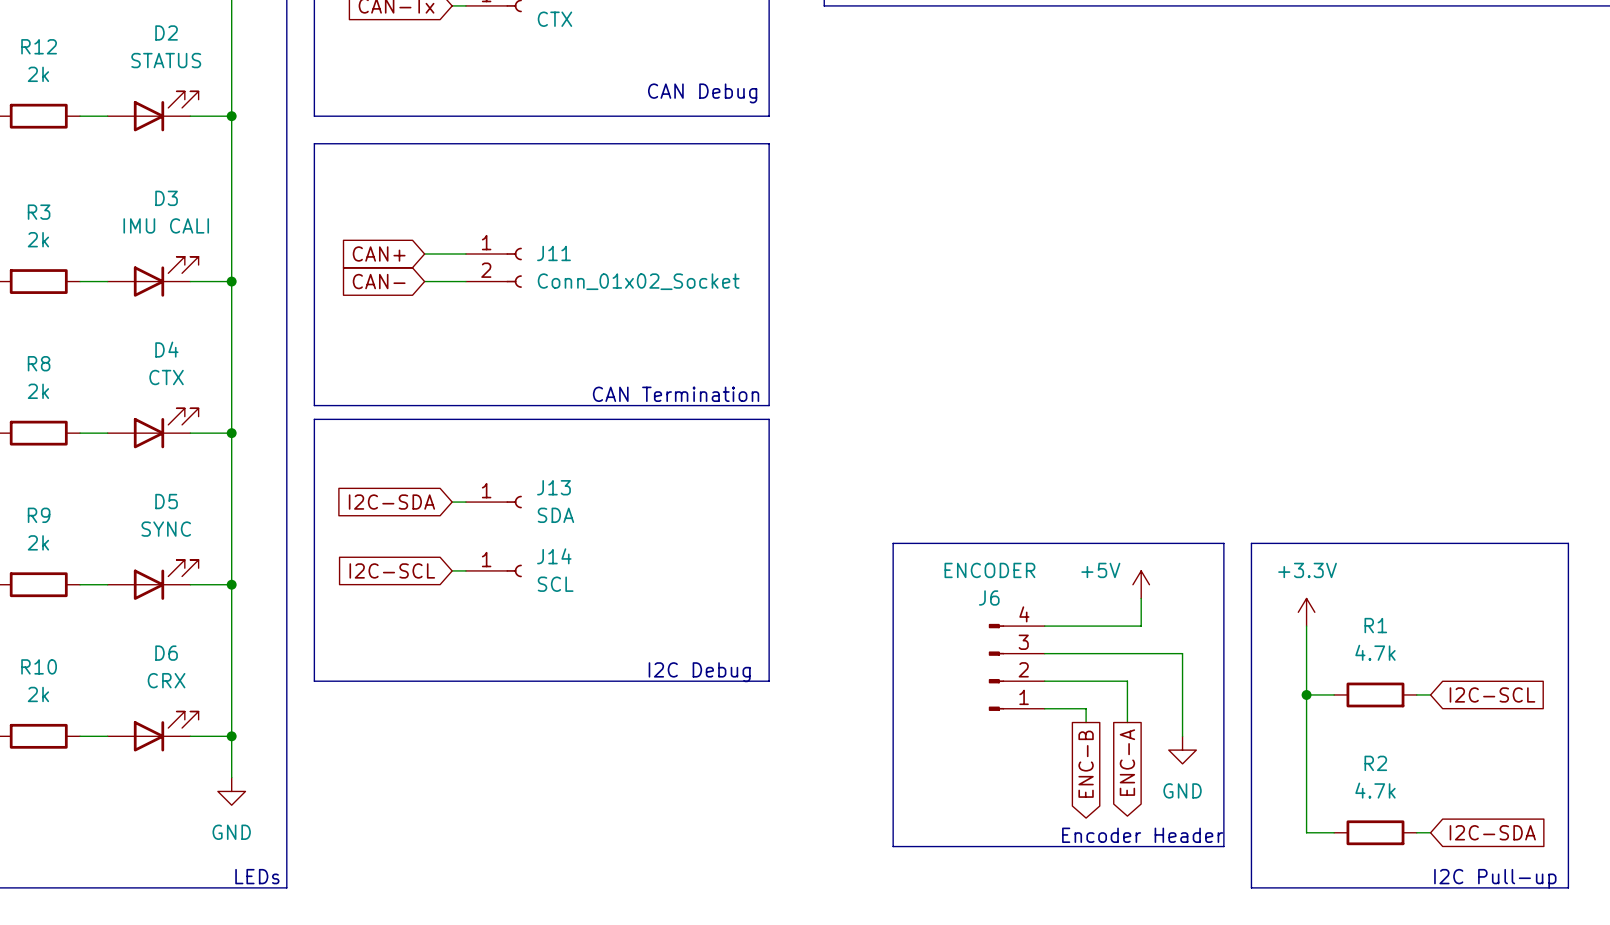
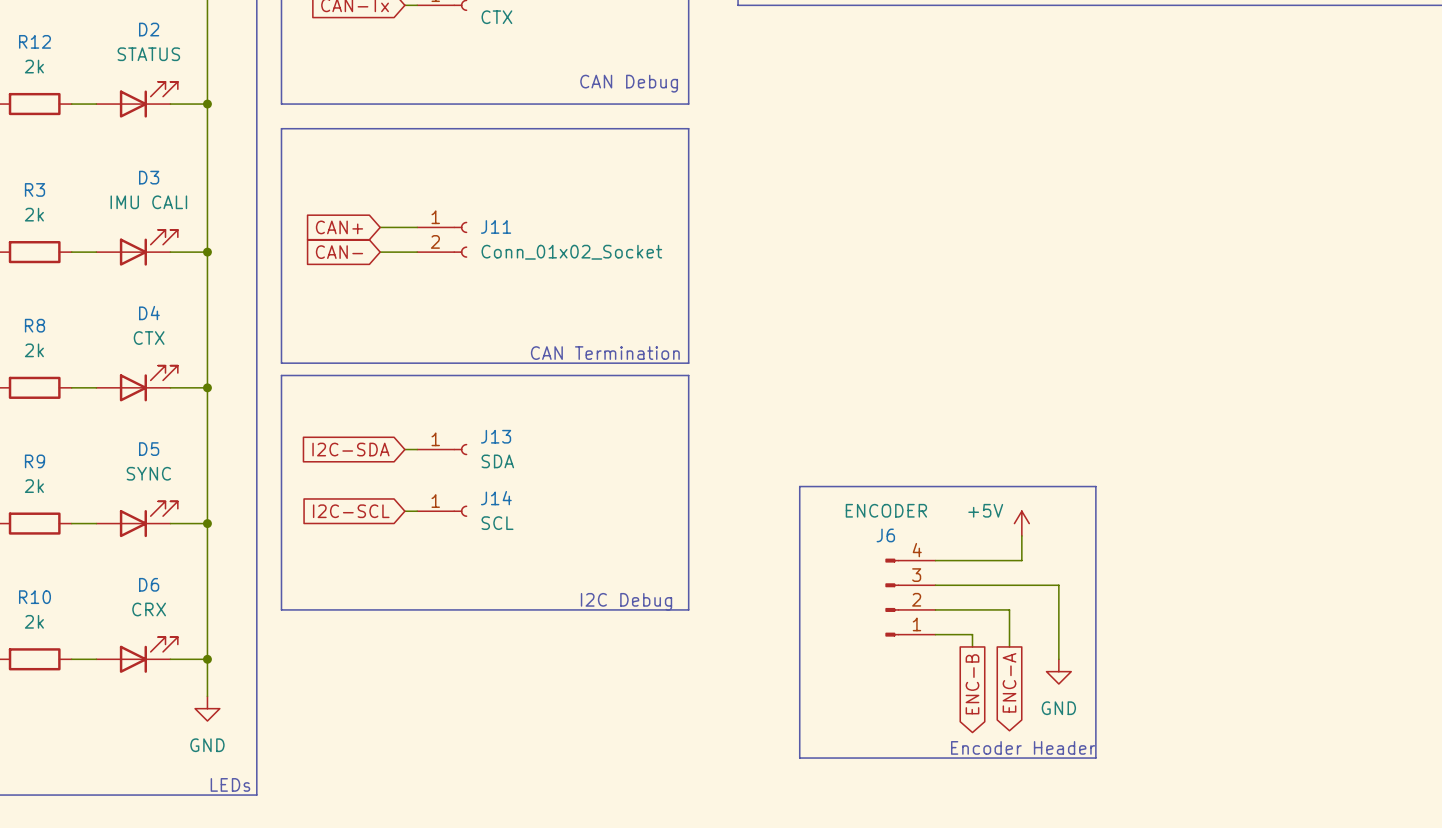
line: (1251, 543) (1568, 543) (1568, 887) (1251, 887) (1251, 543) -> none
power symbol: +3.3V (1306, 612) -> none
wire: (1306, 626) (1306, 832) (1334, 832) -> none
wire: (1306, 694) (1334, 694) -> none
junction: (1306, 694) -> none
R1: 4.7k (1375, 694) -> none
wire: (1416, 694) (1430, 694) -> none
global label: I2C-SCL (1492, 694) -> none
R2: 4.7k (1375, 832) -> none
wire: (1416, 832) (1430, 832) -> none
global label: I2C-SDA (1492, 832) -> none
text: I2C Pull-up (1495, 878) -> none

